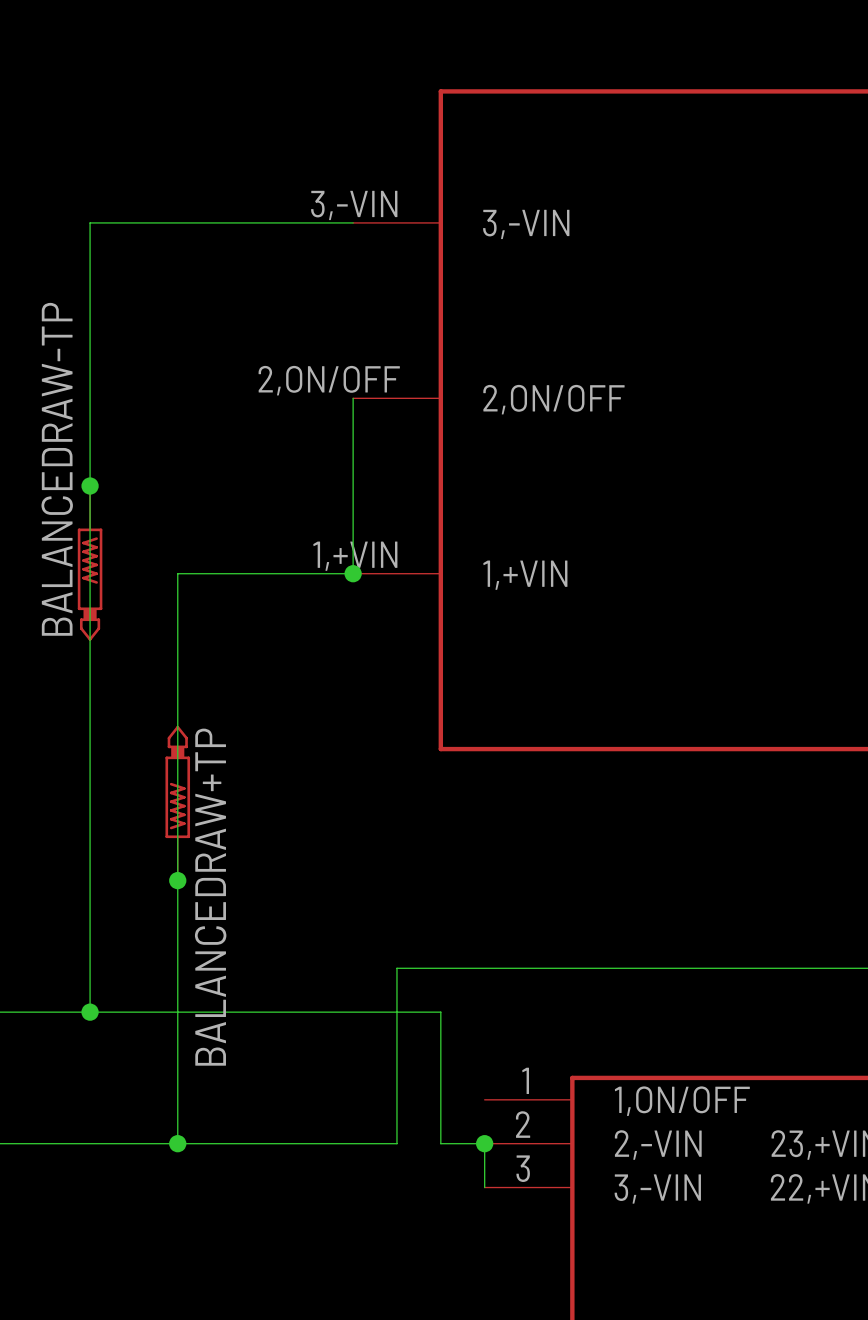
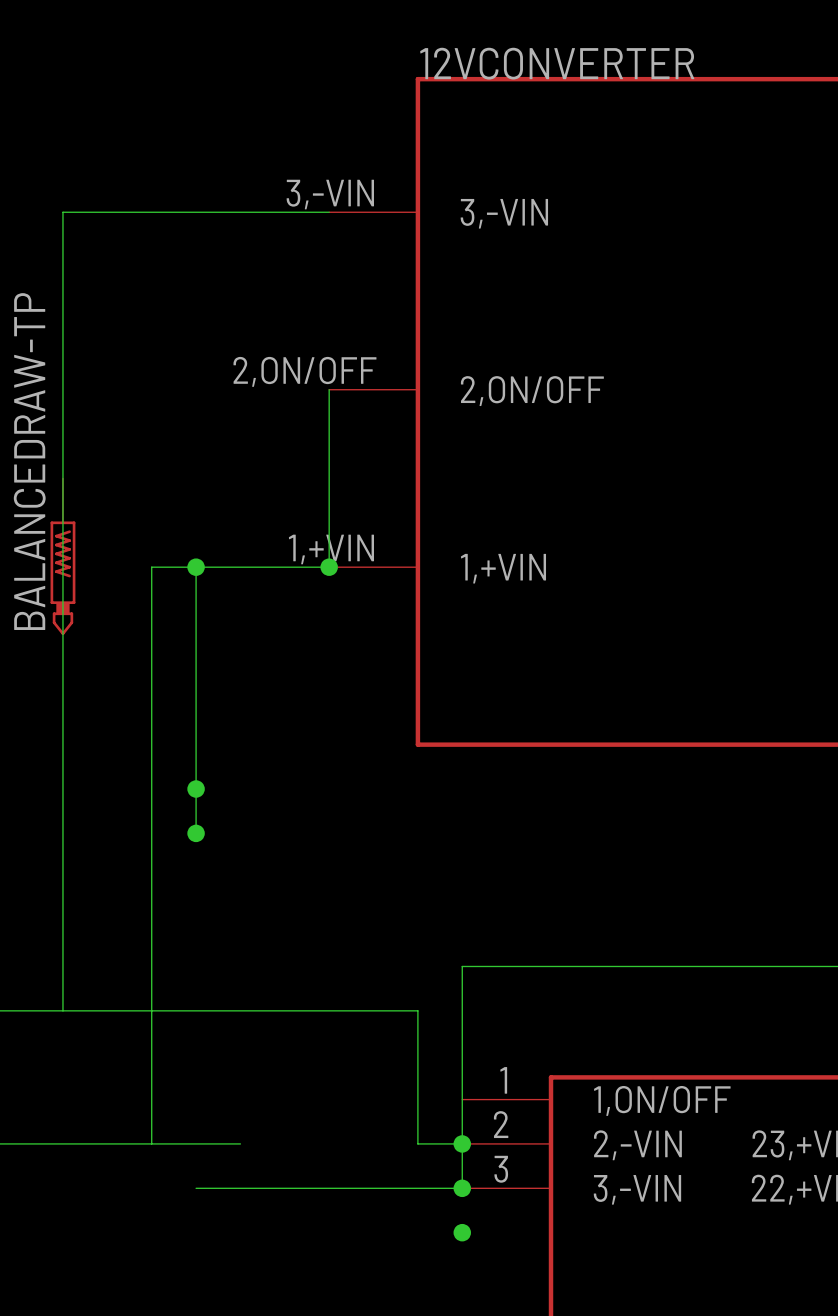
12VCONVERTER name: none -> 12VCONVERTER (557, 63)
junction: (90, 486) -> none
wire: none -> (196, 567) (196, 833)
junction: none -> (196, 567)
junction: none -> (196, 789)
BALANCEDRAW+TP: (177, 803) -> none
junction: none -> (196, 833)
junction: (177, 880) -> none
wire: (484, 968) (396, 968) (396, 1143) (265, 1143) -> (462, 966) (462, 1143)
junction: (90, 1012) -> none
junction: (177, 1143) -> none
wire: none -> (196, 1188) (462, 1188)
junction: none -> (462, 1188)
junction: none -> (462, 1232)

